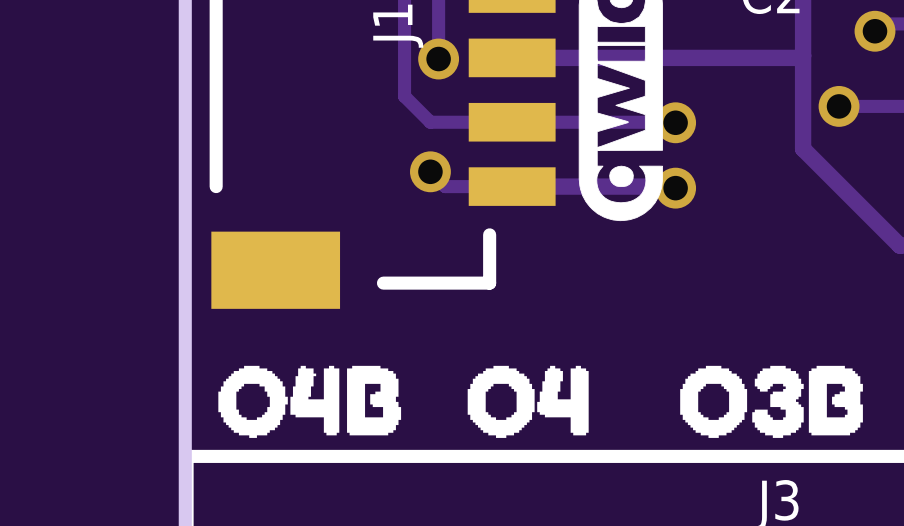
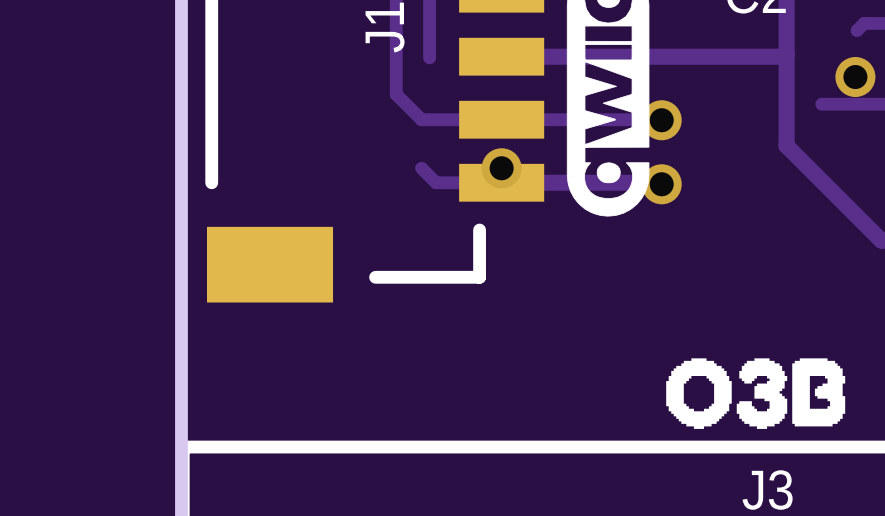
via: (875, 31) -> none
via: (438, 59) -> none
via position: (839, 106) -> (855, 77)
via: (430, 171) -> none
via: none -> (501, 168)
drawing: [218, 365, 589, 438] -> none

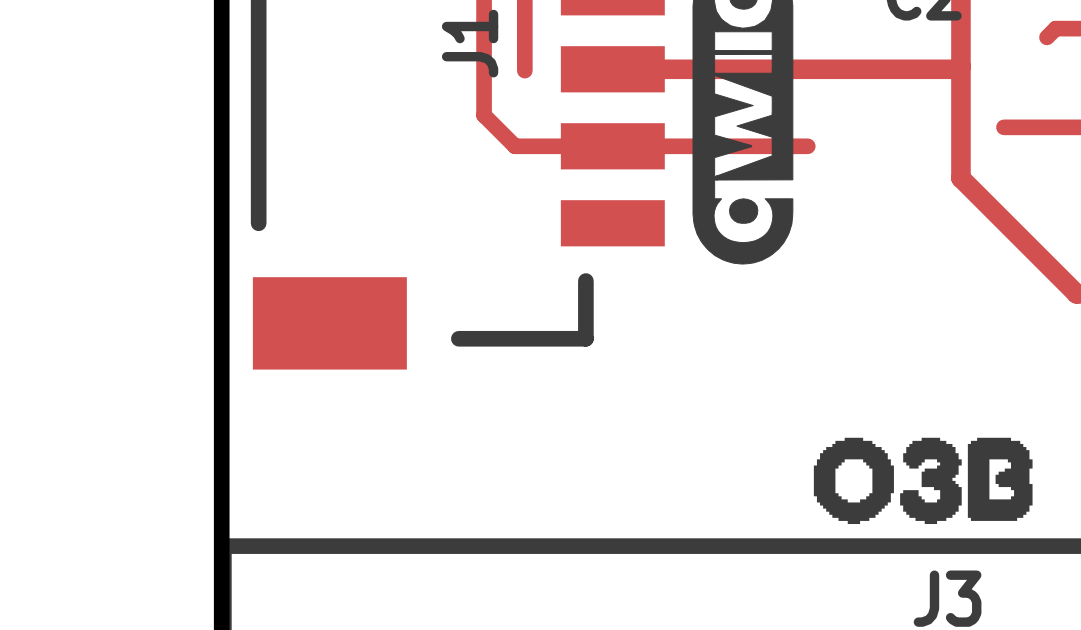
via: (855, 77) -> none
via: (661, 120) -> none
track: (421, 168) (436, 182) (660, 182) (661, 184) -> none
via: (501, 168) -> none
via: (661, 184) -> none

